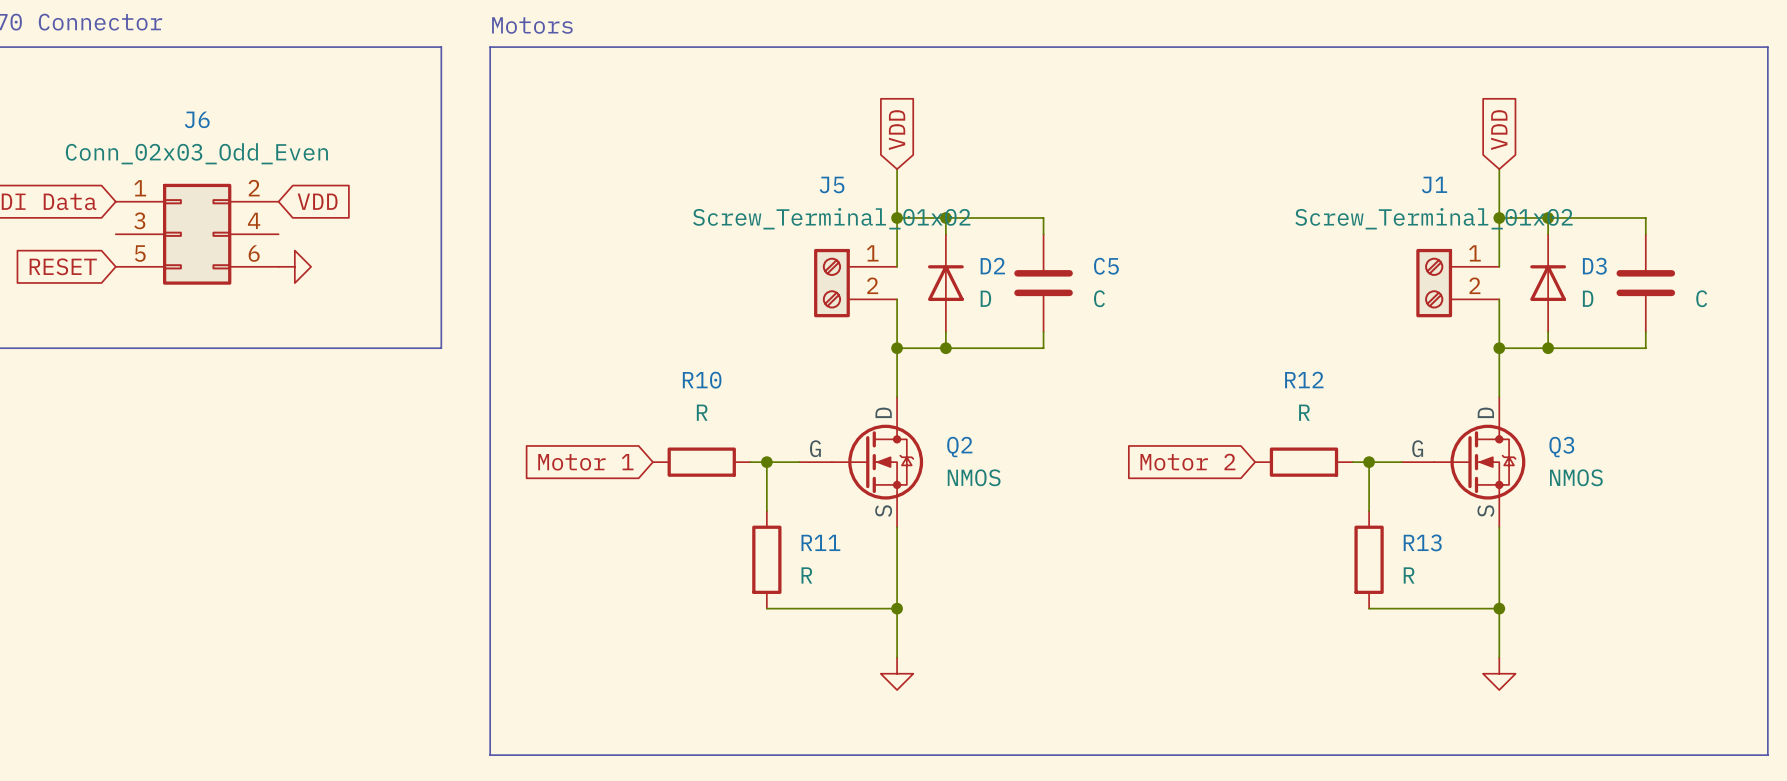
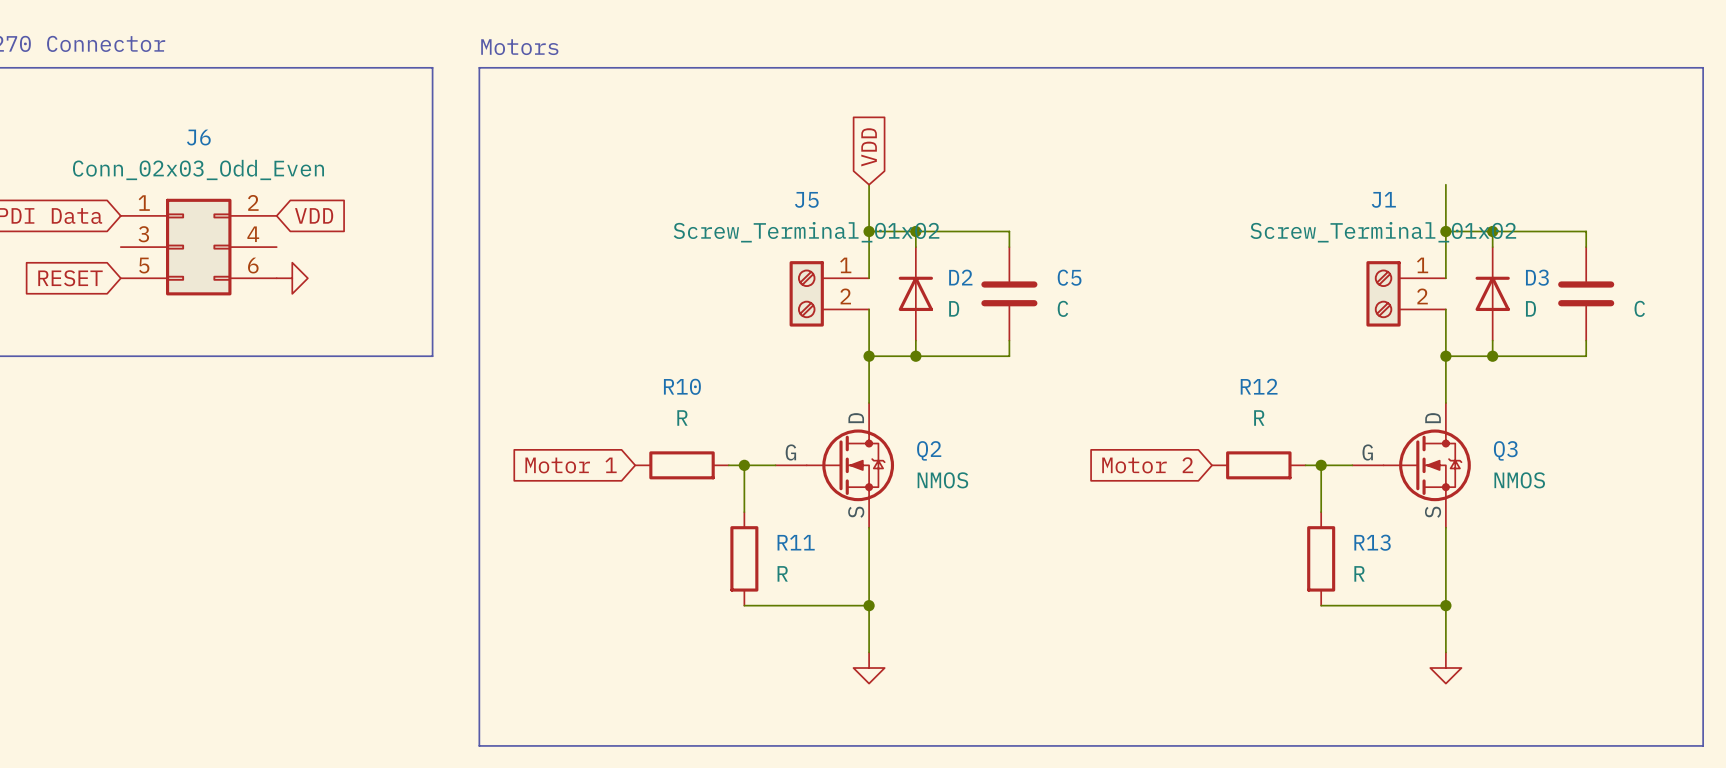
global label: VDD (1499, 130) -> none

